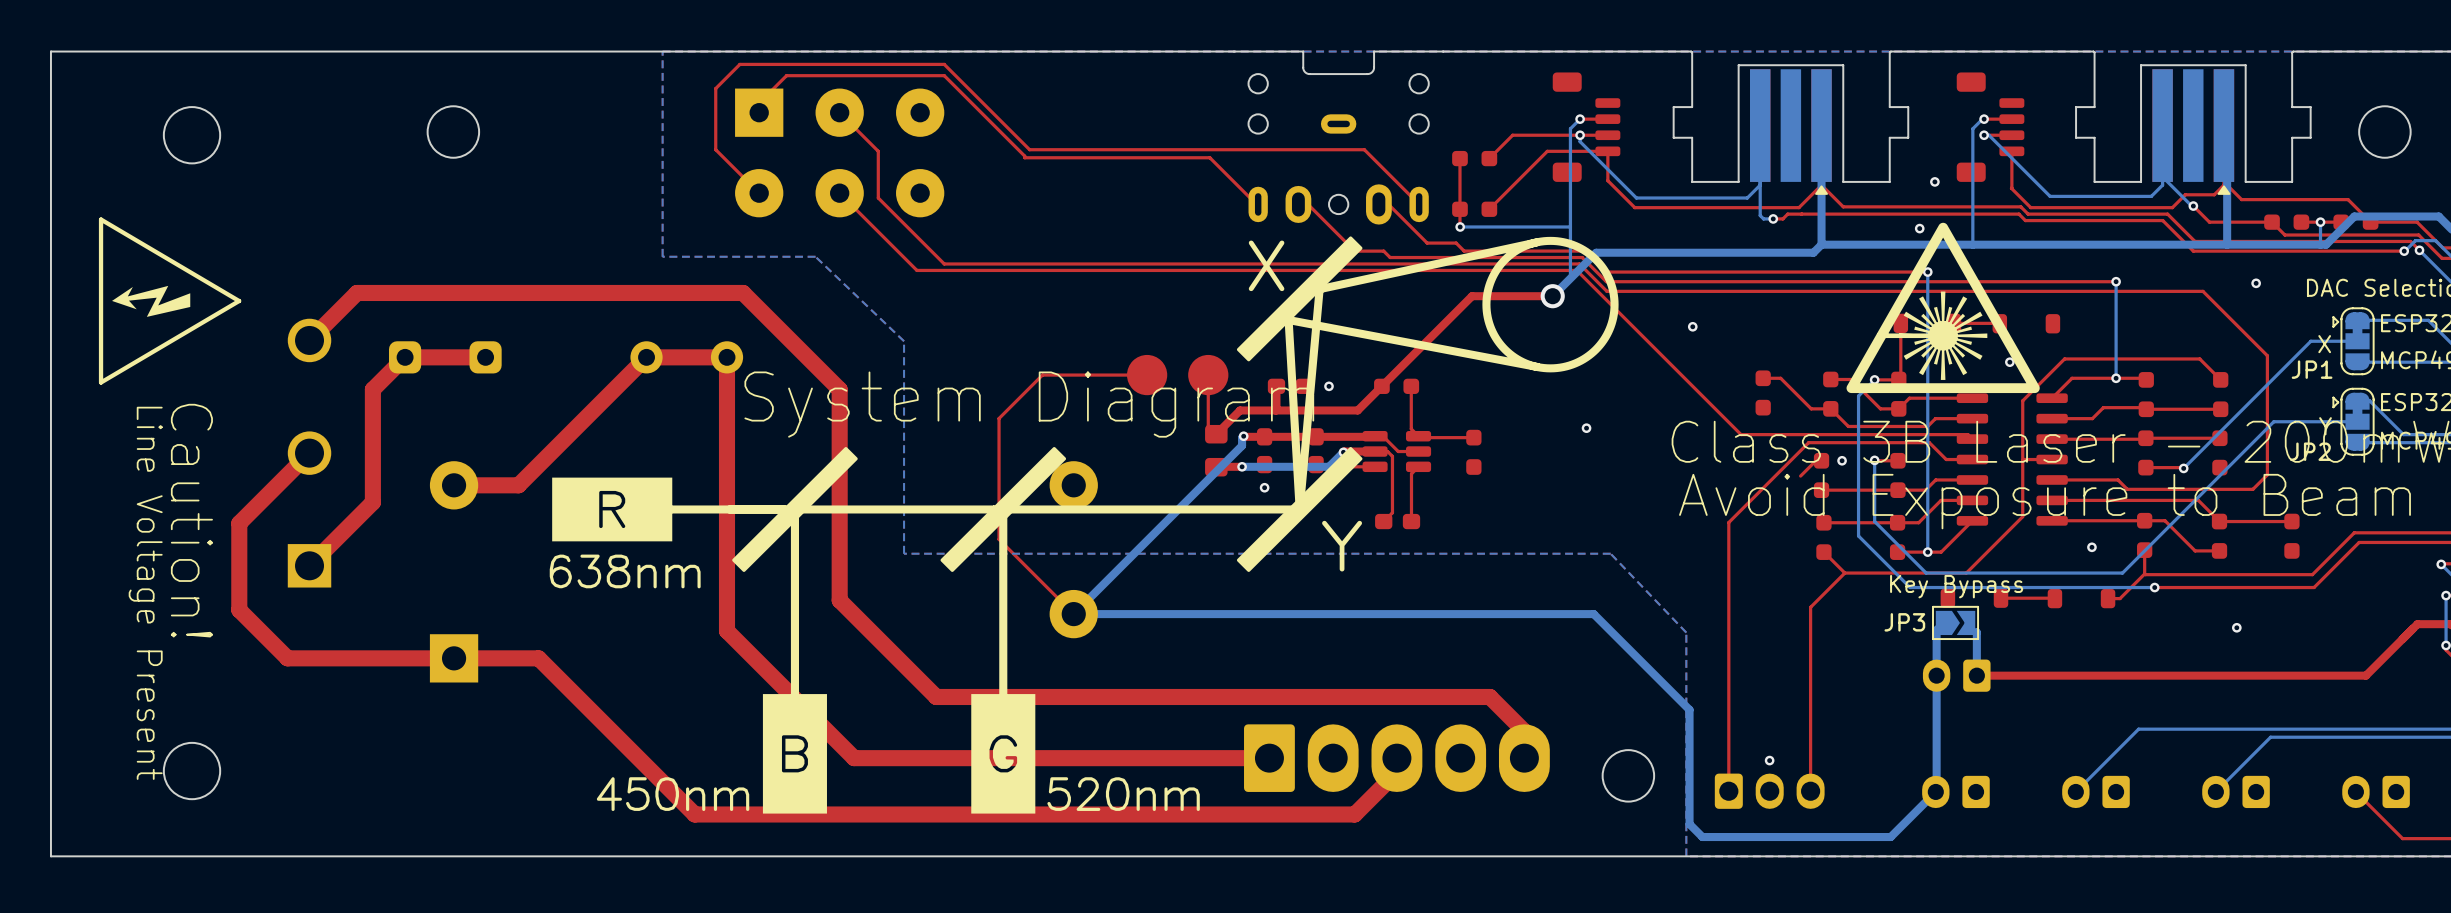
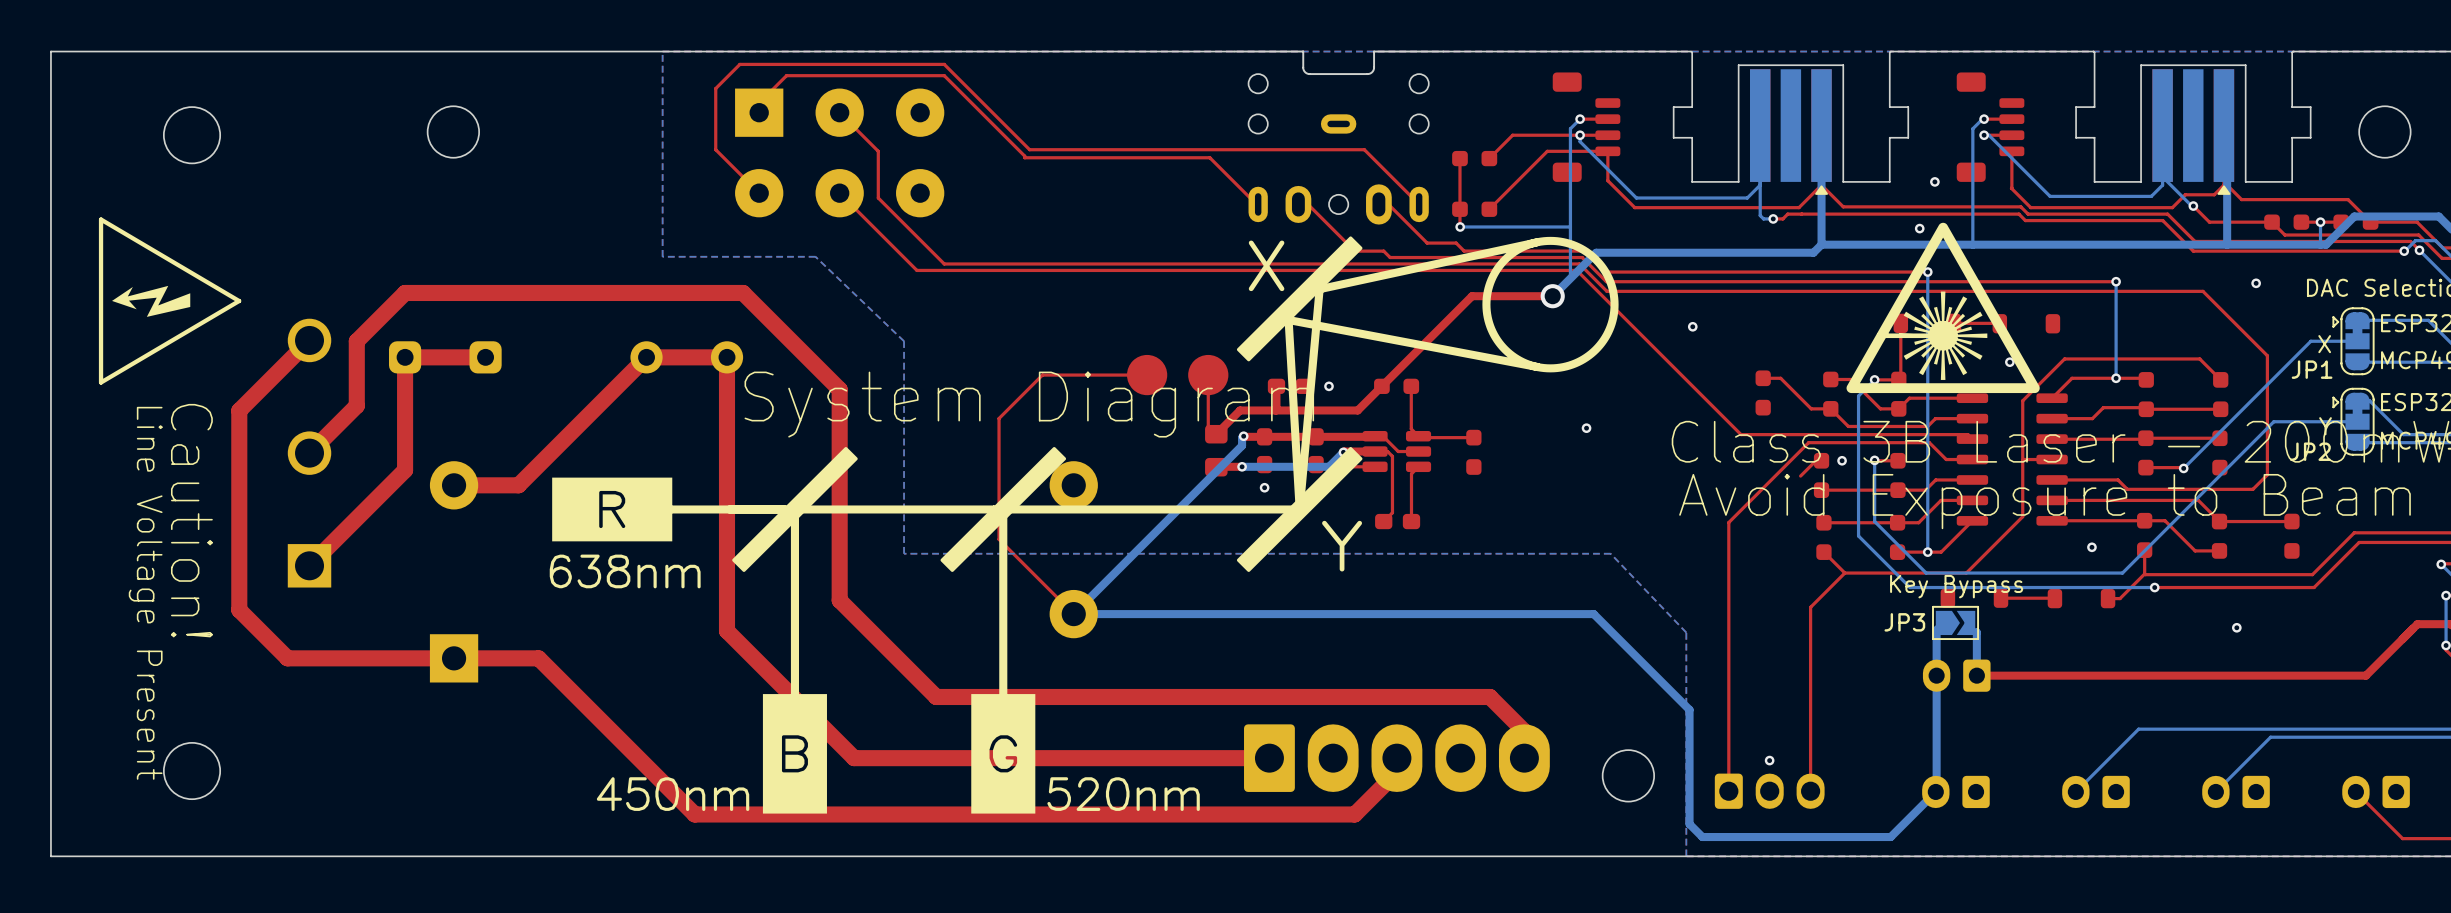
top track: (405, 292) (356, 292) (309, 340) -> (405, 292) (356, 341) (356, 405) (309, 453)
top track: (405, 357) (372, 389) (372, 502) -> (405, 357) (405, 470) (372, 502)
top track: (309, 453) (239, 523) -> (309, 340) (239, 410) (239, 523)

